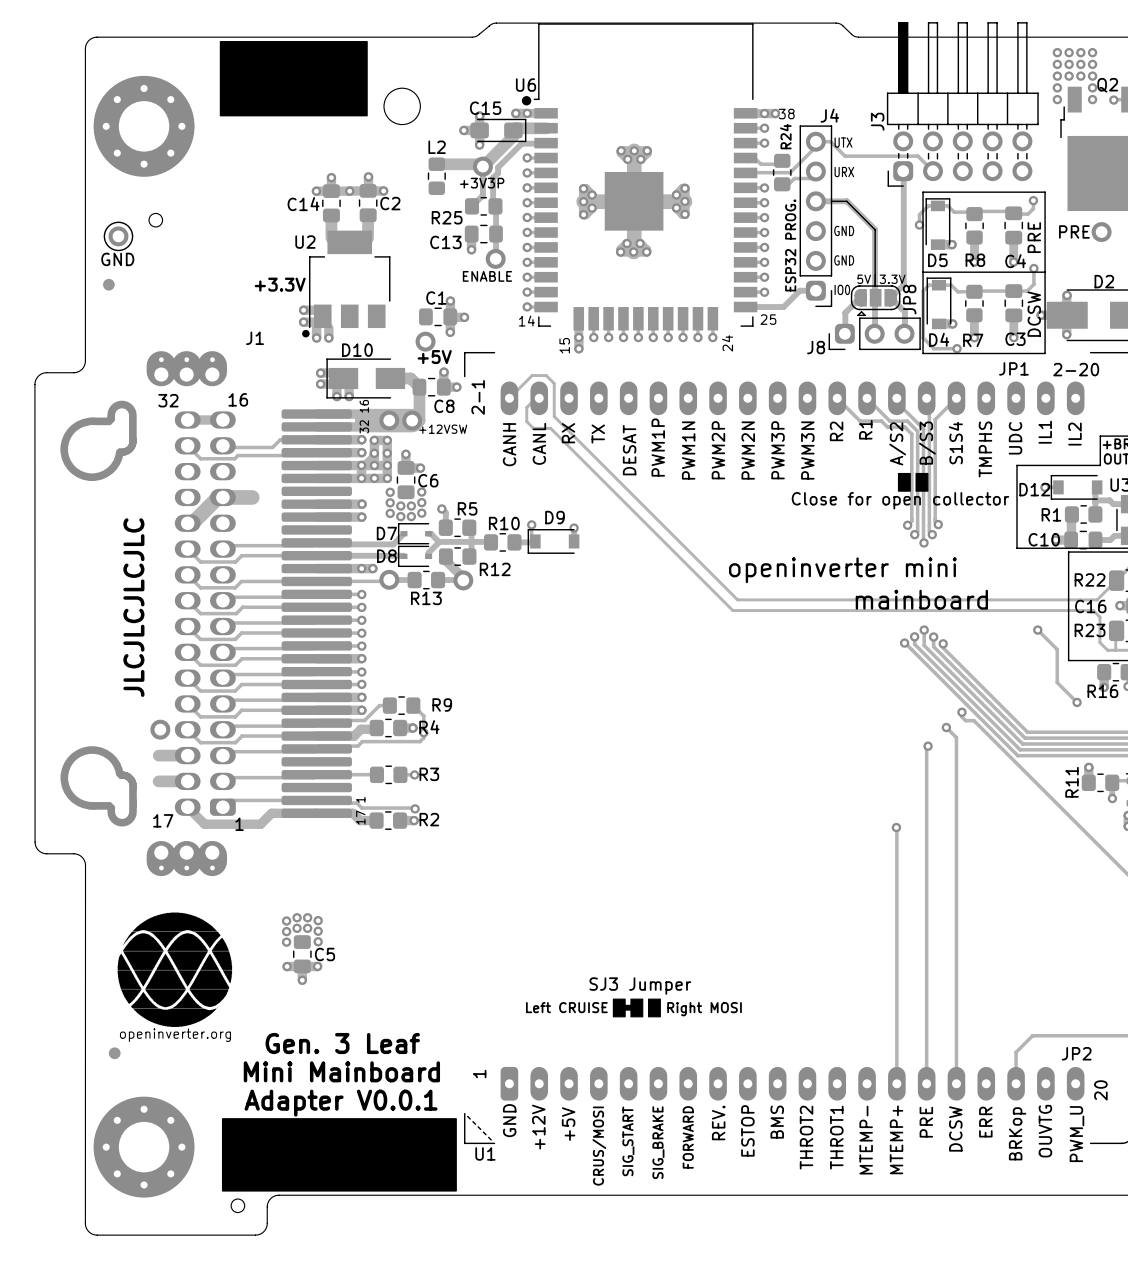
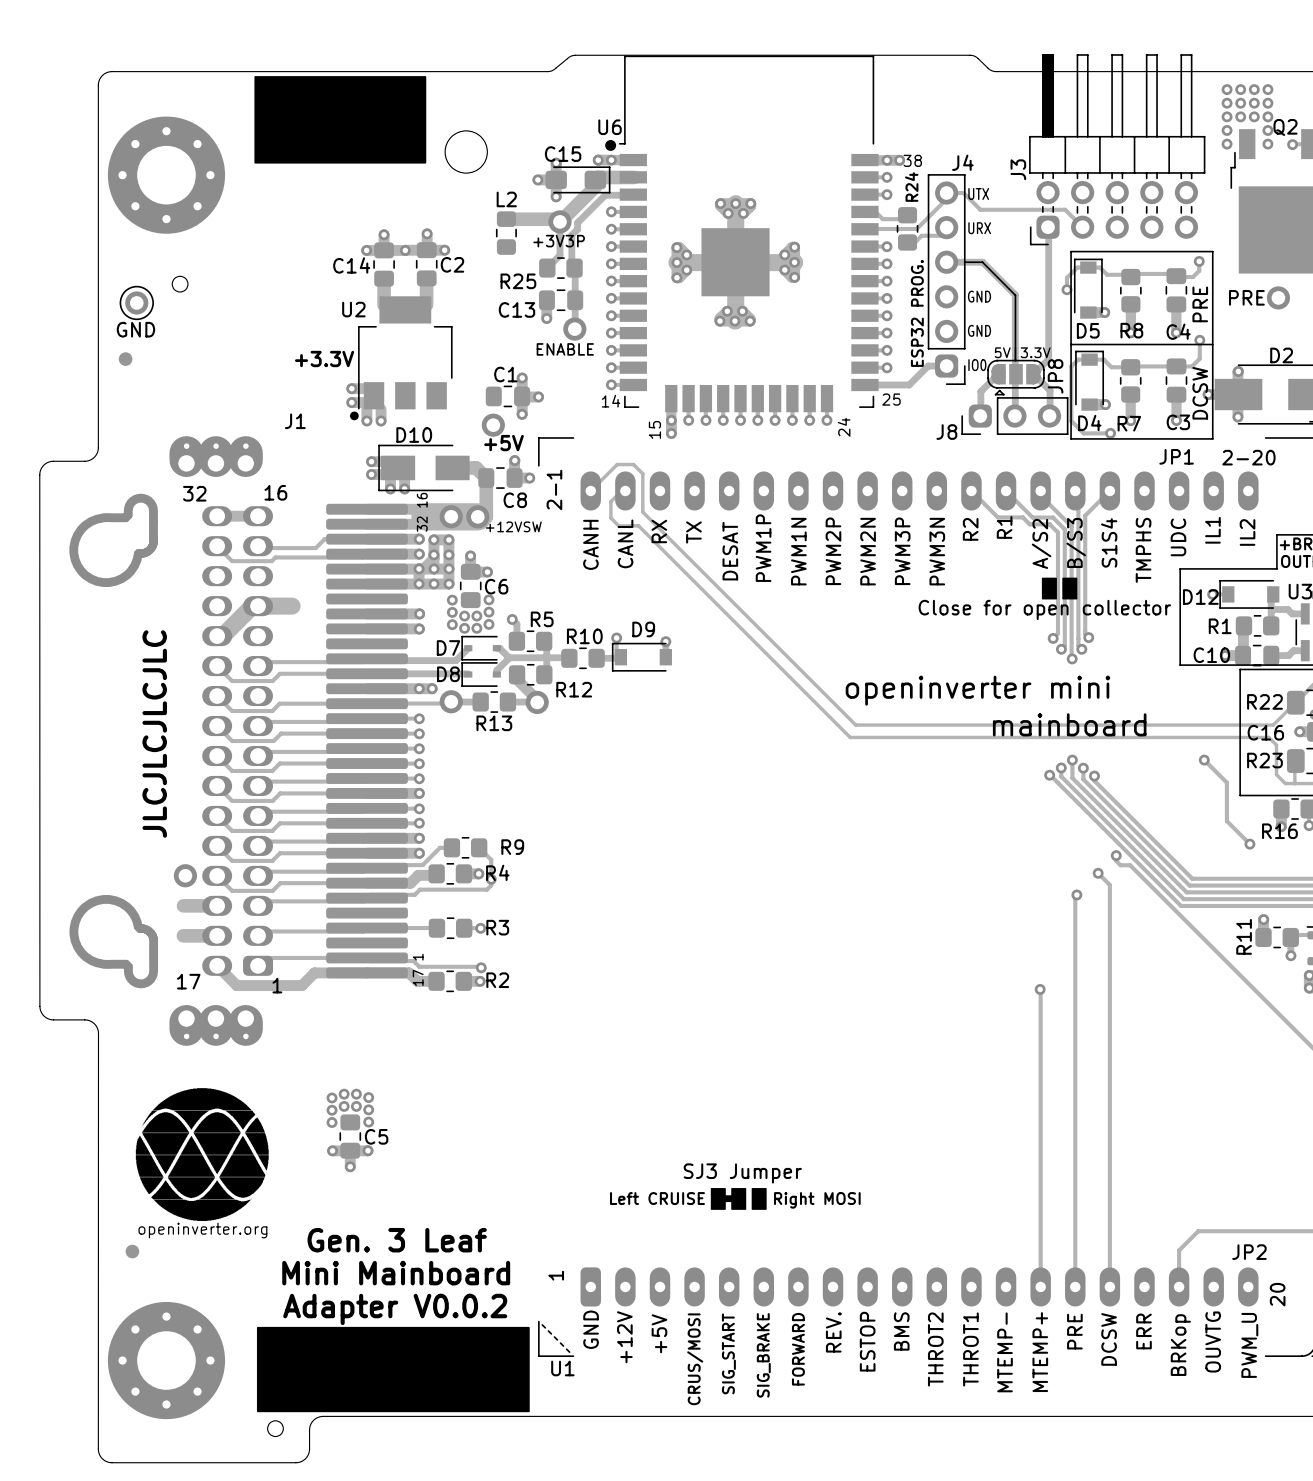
text: Adapter V0.0.1 (341, 1103) -> Adapter V0.0.2 (395, 1309)

